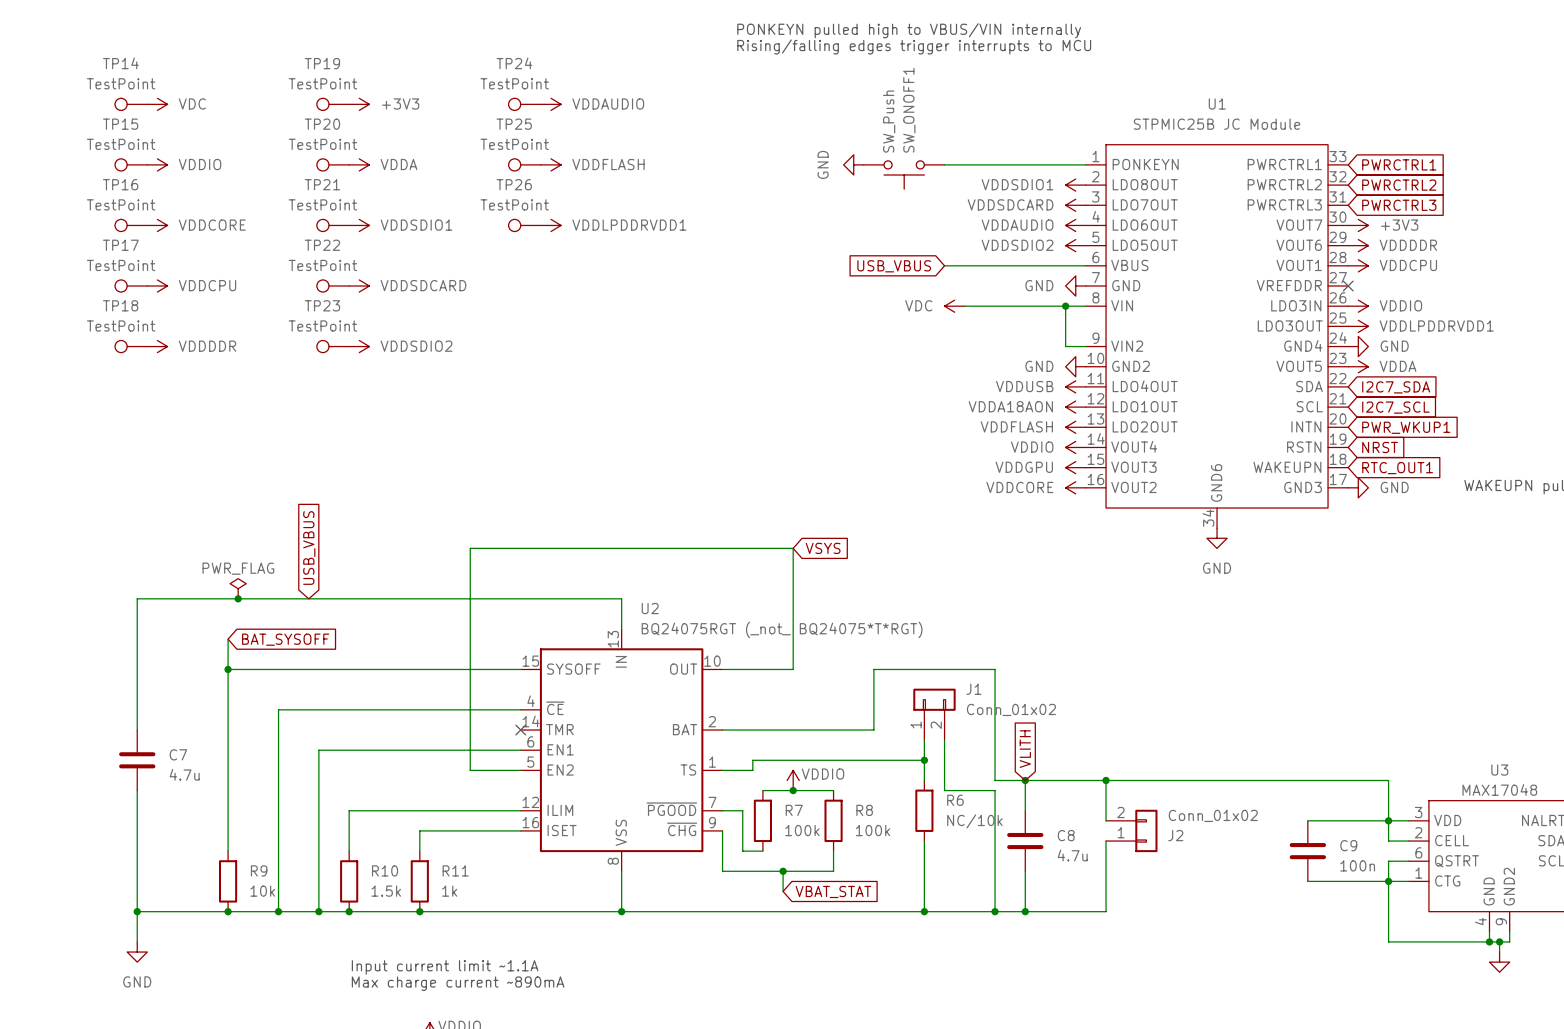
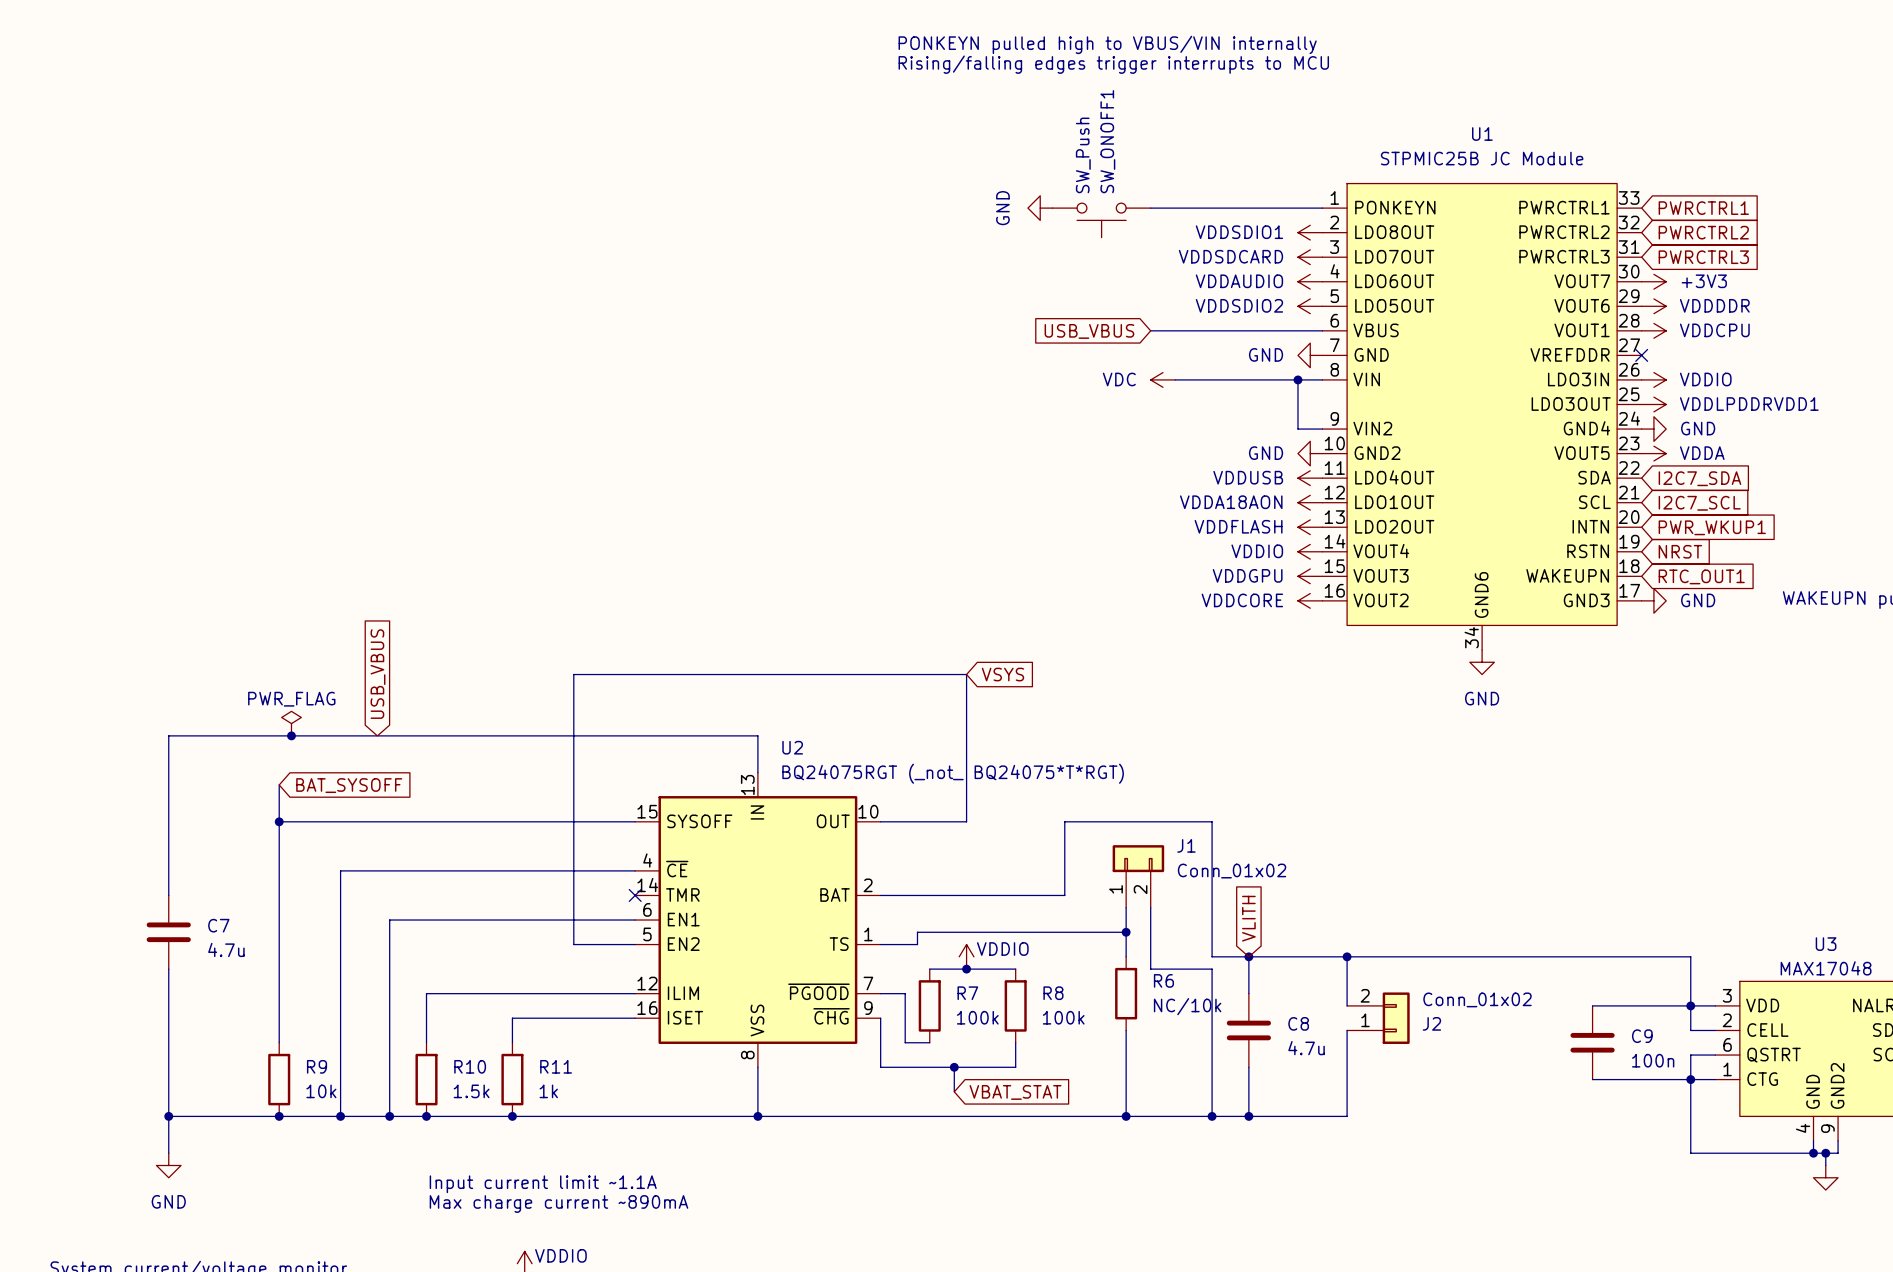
TP14: TestPoint (131, 104) -> none
power symbol: VDC (157, 104) -> none
TP19: TestPoint (333, 104) -> none
power symbol: +3V3 (359, 104) -> none
TP24: TestPoint (524, 104) -> none
power symbol: VDDAUDIO (550, 104) -> none
TP15: TestPoint (131, 164) -> none
power symbol: VDDIO (157, 164) -> none
TP20: TestPoint (333, 164) -> none
power symbol: VDDA (359, 164) -> none
TP25: TestPoint (524, 164) -> none
power symbol: VDDFLASH (550, 164) -> none
TP16: TestPoint (131, 225) -> none
power symbol: VDDCORE (157, 225) -> none
TP21: TestPoint (333, 225) -> none
power symbol: VDDSDIO1 (359, 225) -> none
TP26: TestPoint (524, 225) -> none
power symbol: VDDLPDDRVDD1 (550, 225) -> none
TP17: TestPoint (131, 286) -> none
power symbol: VDDCPU (157, 286) -> none
TP22: TestPoint (333, 286) -> none
power symbol: VDDSDCARD (359, 286) -> none
TP18: TestPoint (131, 346) -> none
power symbol: VDDDDR (157, 346) -> none
TP23: TestPoint (333, 346) -> none
power symbol: VDDSDIO2 (359, 346) -> none

